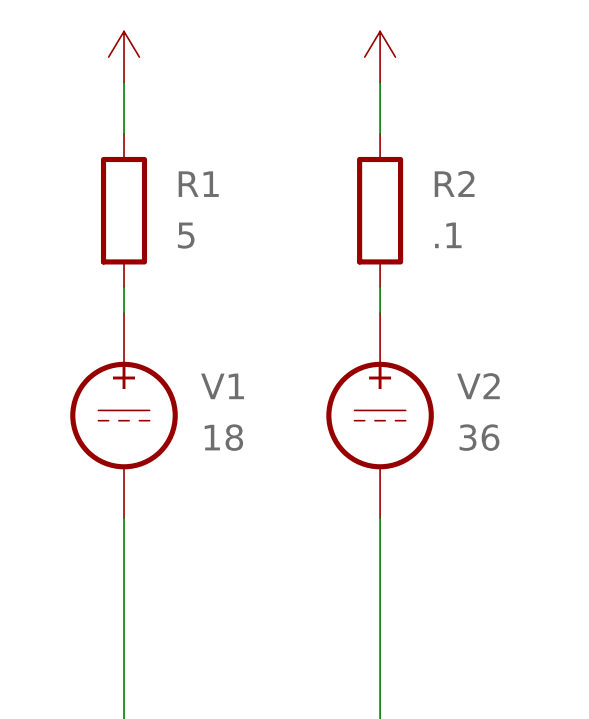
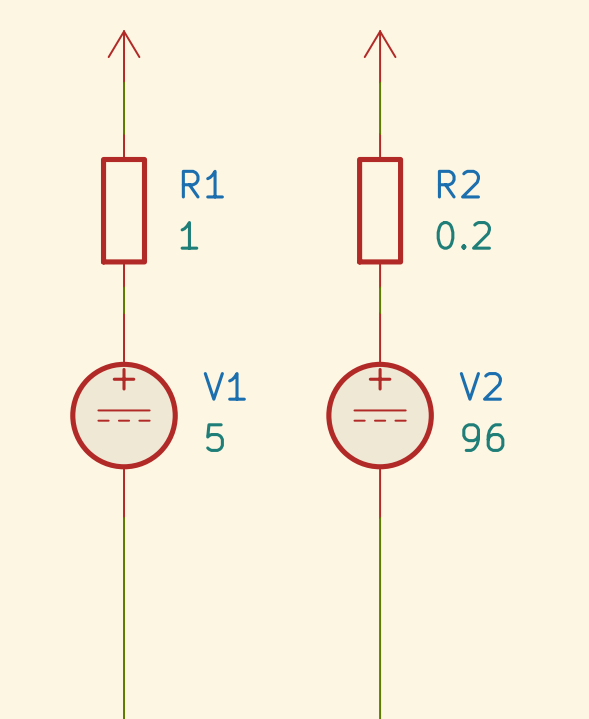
R1 value: 5 (186, 235) -> 1 (189, 235)
R2 value: .1 (448, 235) -> 0.2 (463, 235)
V1 value: 18 (223, 437) -> 5 (215, 437)
V2 value: 36 (479, 437) -> 96 (483, 437)

